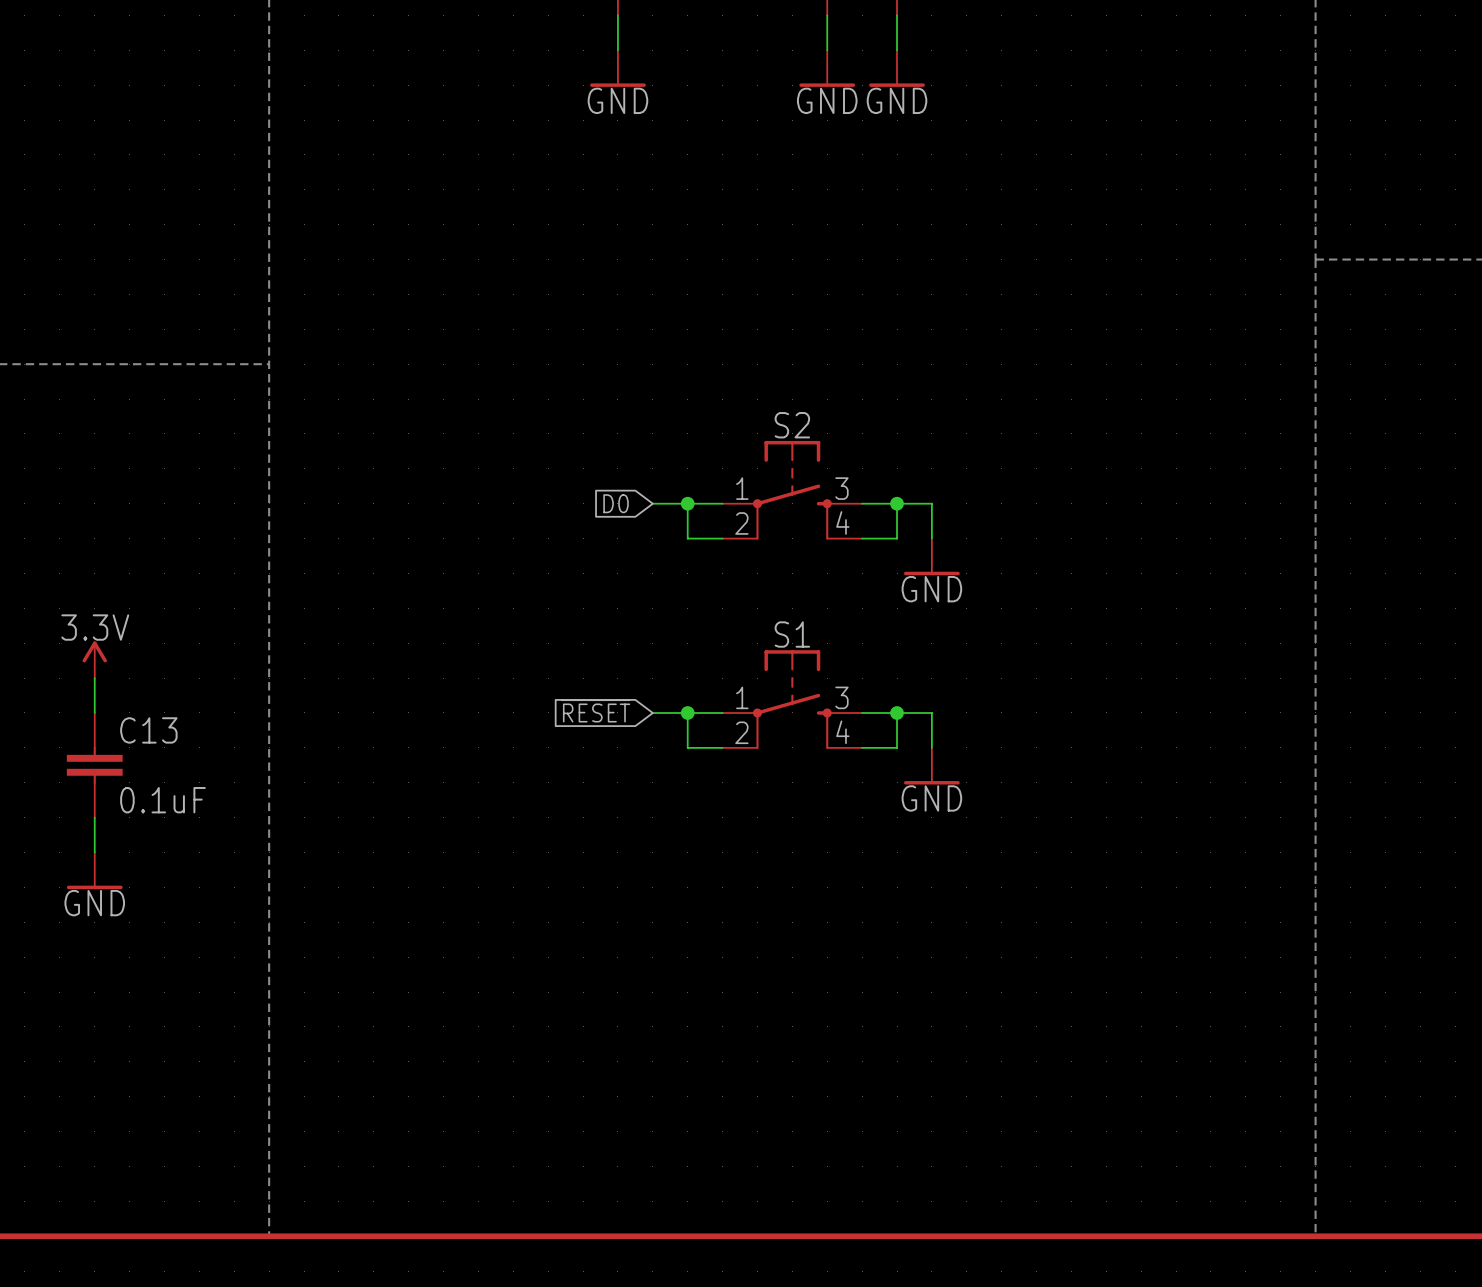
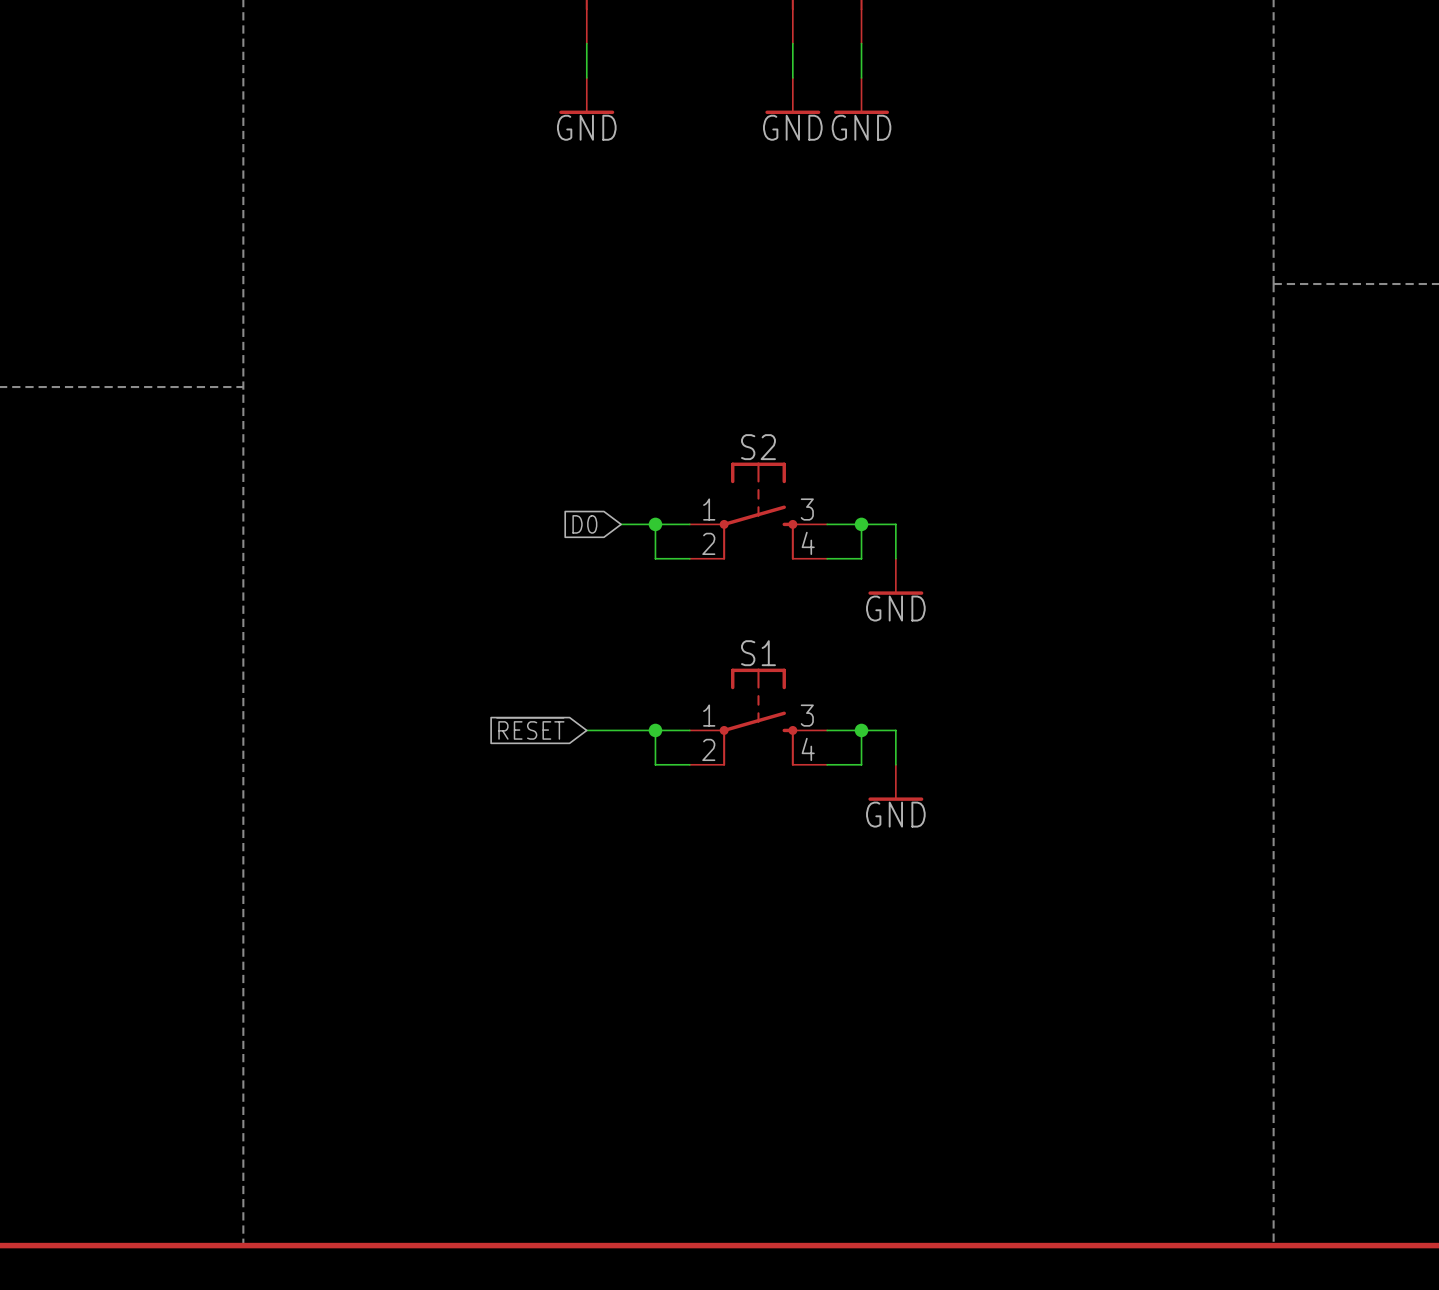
power symbol: 3.3V (94, 659) -> none
wire: (94, 678) (94, 712) -> none
global label position: ~{RESET} (595, 710) -> ~{RESET} (530, 728)
wire: none -> (586, 730) (621, 730)
C13: 0.1uF (94, 765) -> none
wire: (94, 817) (94, 852) -> none
power symbol: GND (94, 870) -> none

